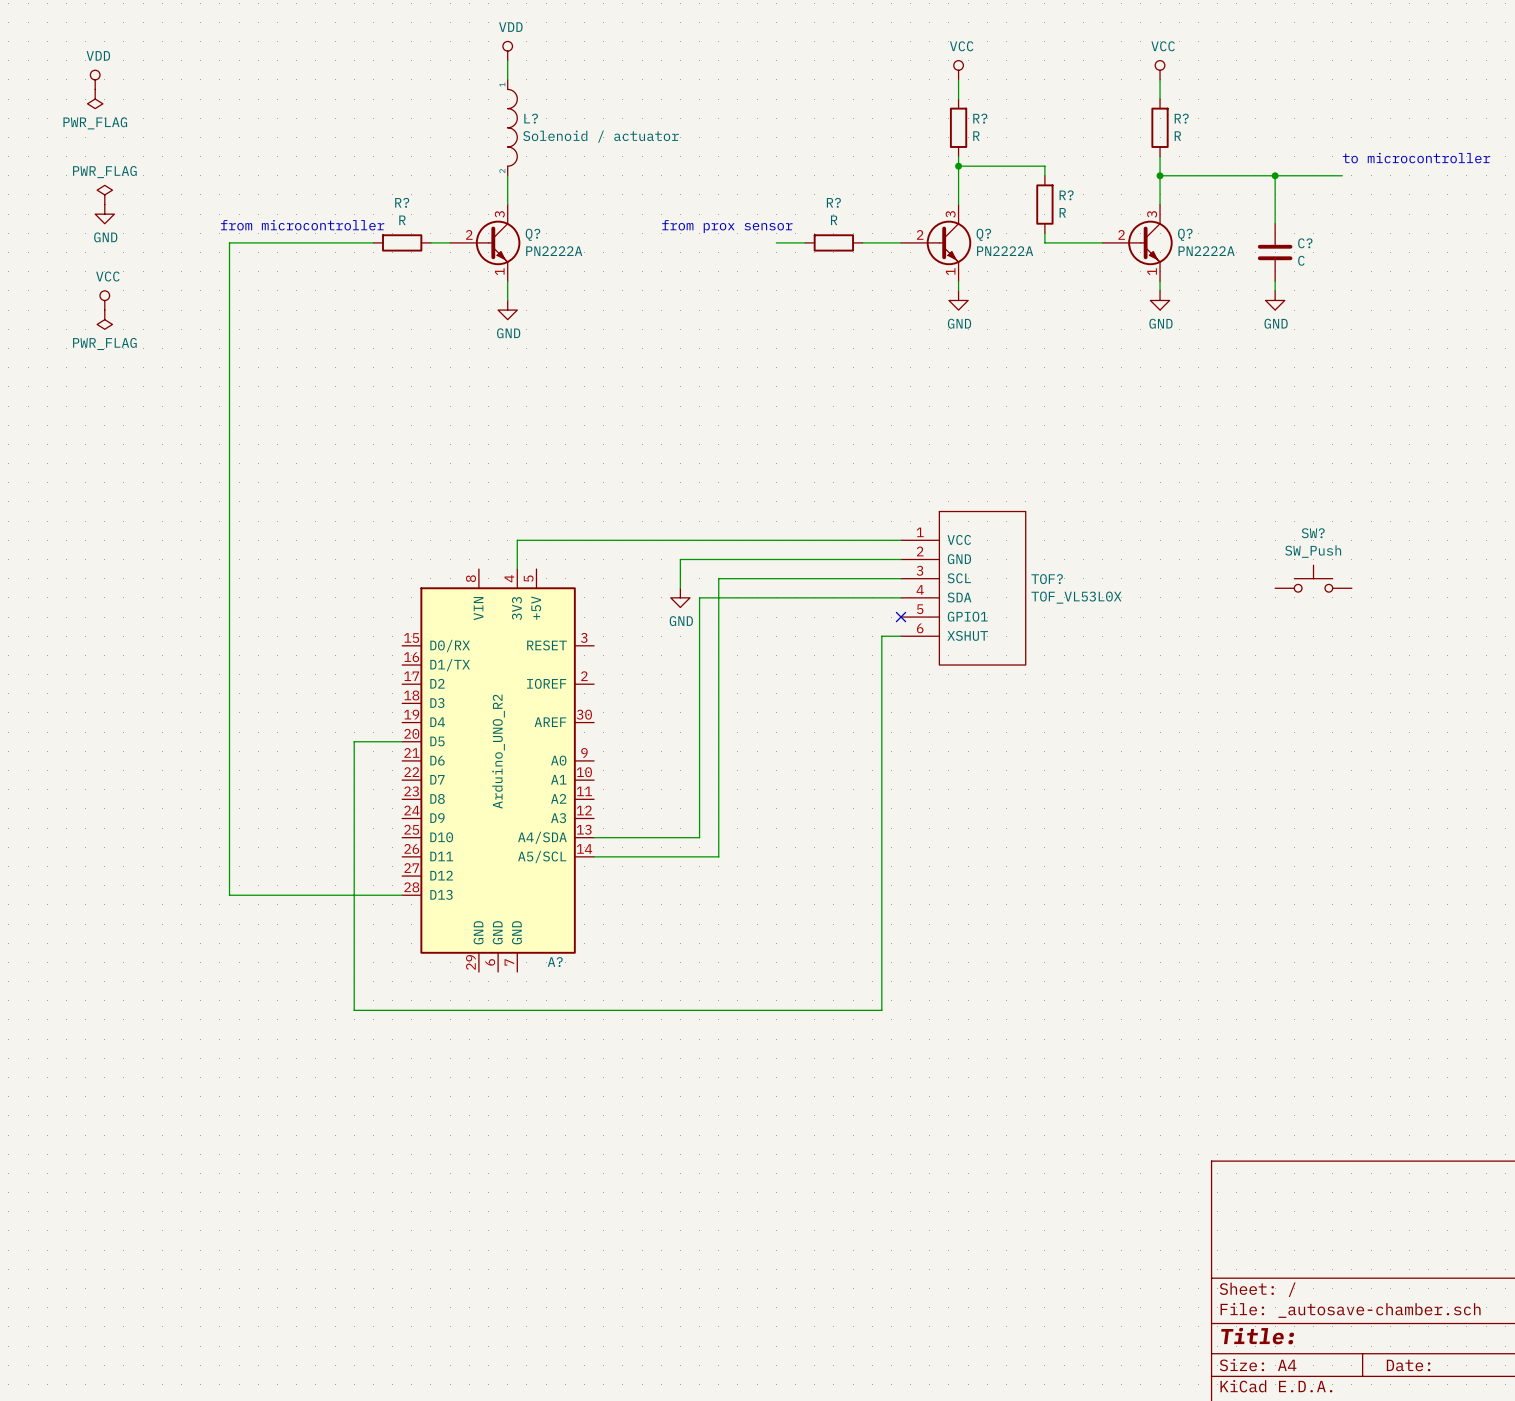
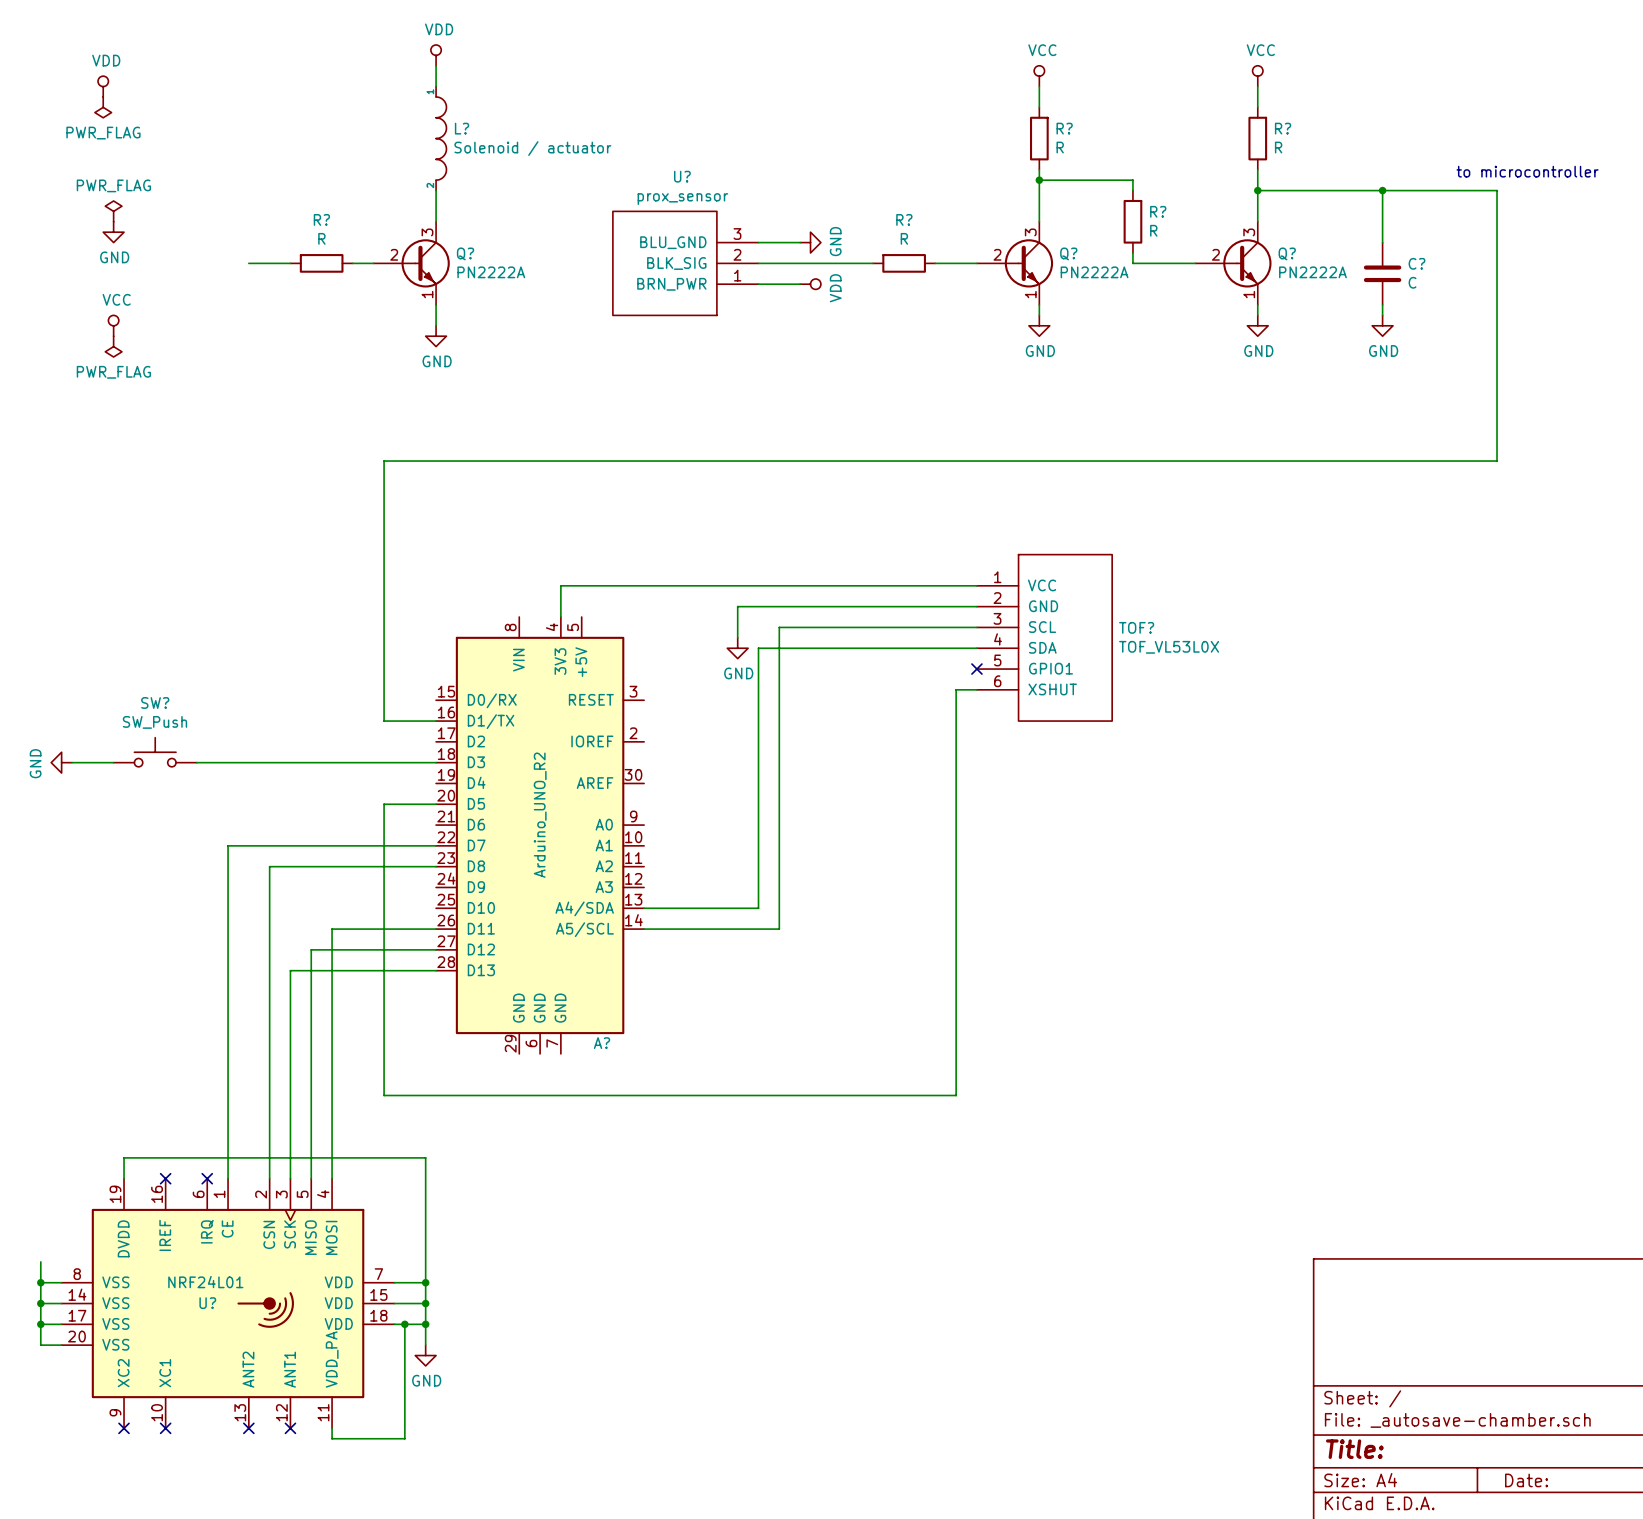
power symbol position: VDD (507, 51) -> VDD (436, 55)
wire: (507, 60) (507, 79) -> (436, 65) (436, 86)
L? position: (512, 127) -> (441, 138)
wire: (507, 175) (507, 204) -> (436, 190) (436, 221)
wire: none -> (1455, 190) (1497, 190) (1497, 461) (384, 461) (384, 721) (436, 721)
wire: none -> (758, 242) (800, 242)
power symbol: none -> GND (810, 242)
text: from microcontroller (302, 225) -> none
text: from prox sensor (727, 226) -> none
wire: (229, 242) (229, 895) (267, 895) -> (290, 1178) (290, 970)
wire: (267, 242) (325, 242) -> none
R? position: (402, 242) -> (321, 263)
wire: (430, 242) (450, 242) -> none
Q? position: (485, 242) -> (411, 263)
U?: none -> prox_sensor (680, 263)
wire: none -> (758, 263) (841, 263)
wire: none -> (758, 284) (800, 284)
power symbol: none -> VDD (810, 284)
wire: (507, 281) (507, 300) -> (436, 305) (436, 325)
power symbol position: GND (507, 310) -> GND (436, 336)
SW?: SW_Push (1313, 578) -> none
SW?: none -> SW_Push (155, 752)
power symbol: none -> GND (61, 762)
wire: none -> (72, 762) (113, 762)
wire: none -> (196, 762) (436, 762)
wire: none -> (436, 845) (228, 845) (228, 1178)
wire: none -> (436, 866) (269, 866) (269, 1178)
wire: none -> (436, 929) (332, 929) (332, 1178)
wire: none -> (436, 949) (311, 949) (311, 1178)
wire: none -> (124, 1178) (124, 1157) (425, 1157) (425, 1345)
no-connect mark: none -> (165, 1178)
no-connect mark: none -> (207, 1178)
wire: none -> (40, 1261) (40, 1345) (61, 1345)
wire: none -> (40, 1282) (61, 1282)
junction: none -> (40, 1282)
wire: none -> (394, 1282) (425, 1282)
junction: none -> (425, 1282)
wire: none -> (40, 1303) (61, 1303)
junction: none -> (40, 1303)
U?: none -> NRF24L01 (228, 1303)
wire: none -> (394, 1303) (425, 1303)
junction: none -> (425, 1303)
wire: none -> (40, 1324) (61, 1324)
junction: none -> (40, 1324)
wire: none -> (394, 1324) (425, 1324)
wire: none -> (404, 1324) (404, 1438) (332, 1438) (332, 1428)
junction: none -> (404, 1324)
junction: none -> (425, 1324)
power symbol: none -> GND (425, 1355)
no-connect mark: none -> (124, 1428)
no-connect mark: none -> (165, 1428)
no-connect mark: none -> (248, 1428)
no-connect mark: none -> (290, 1428)

